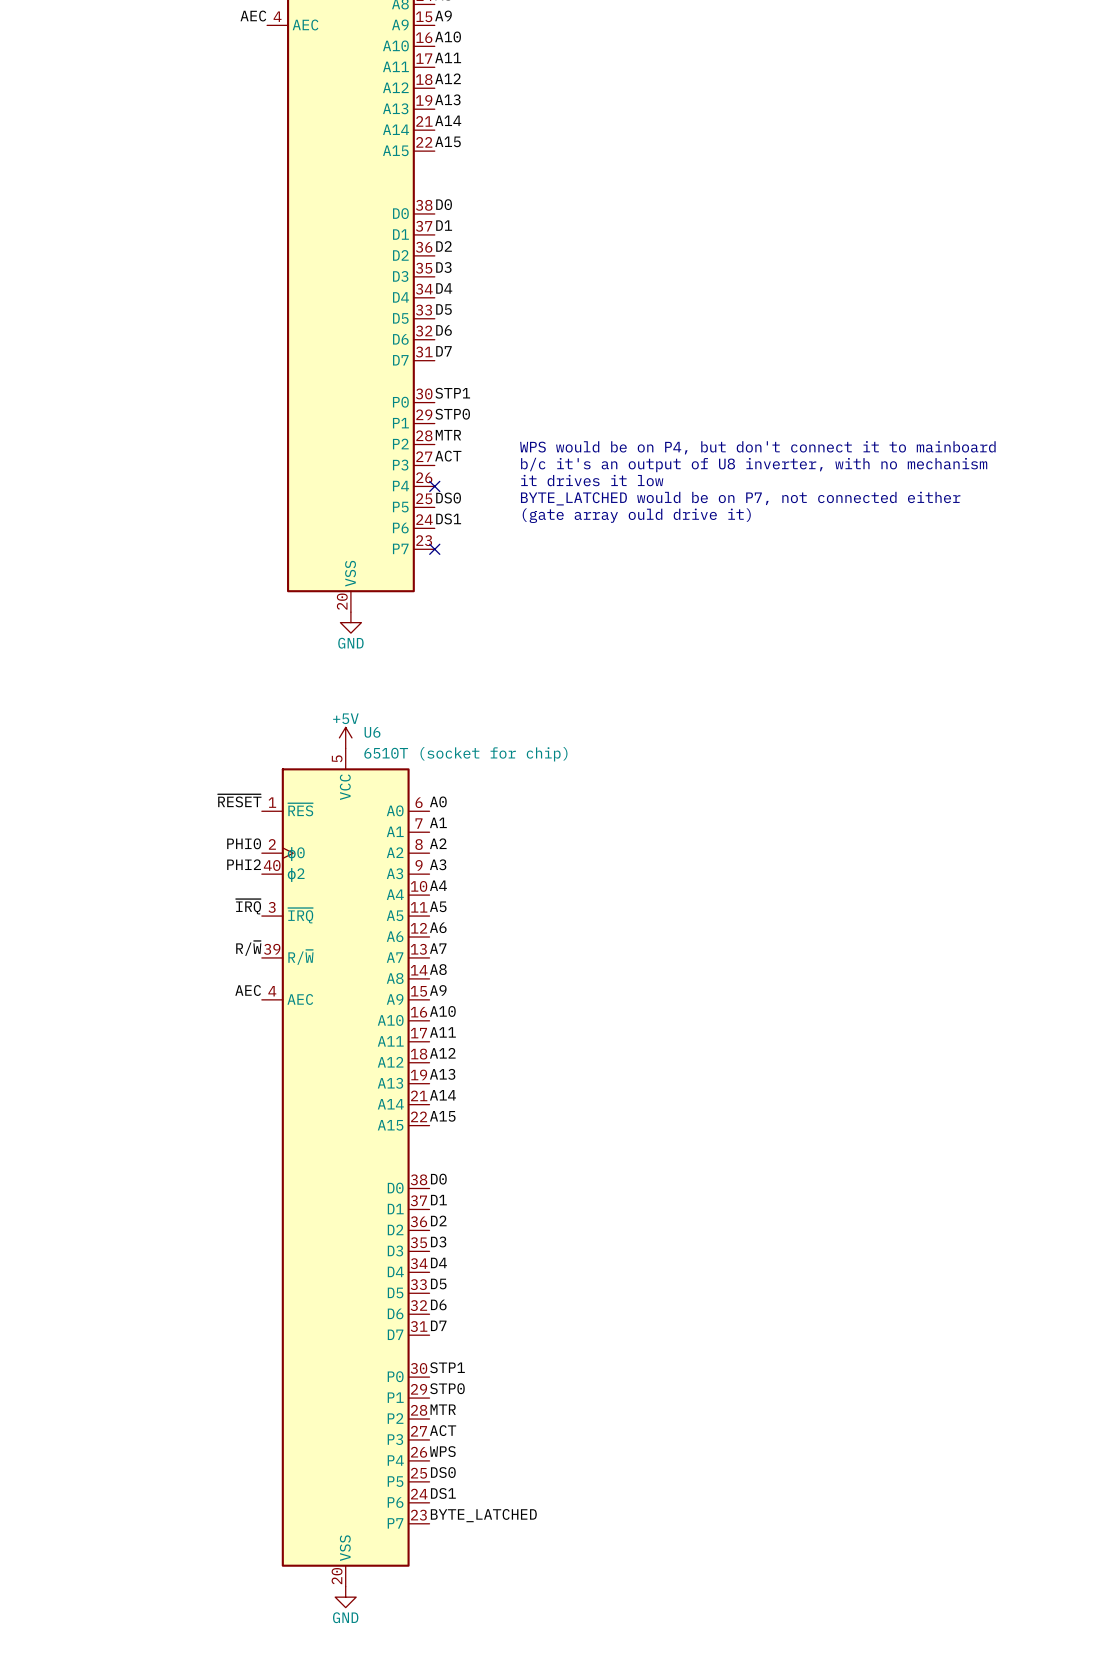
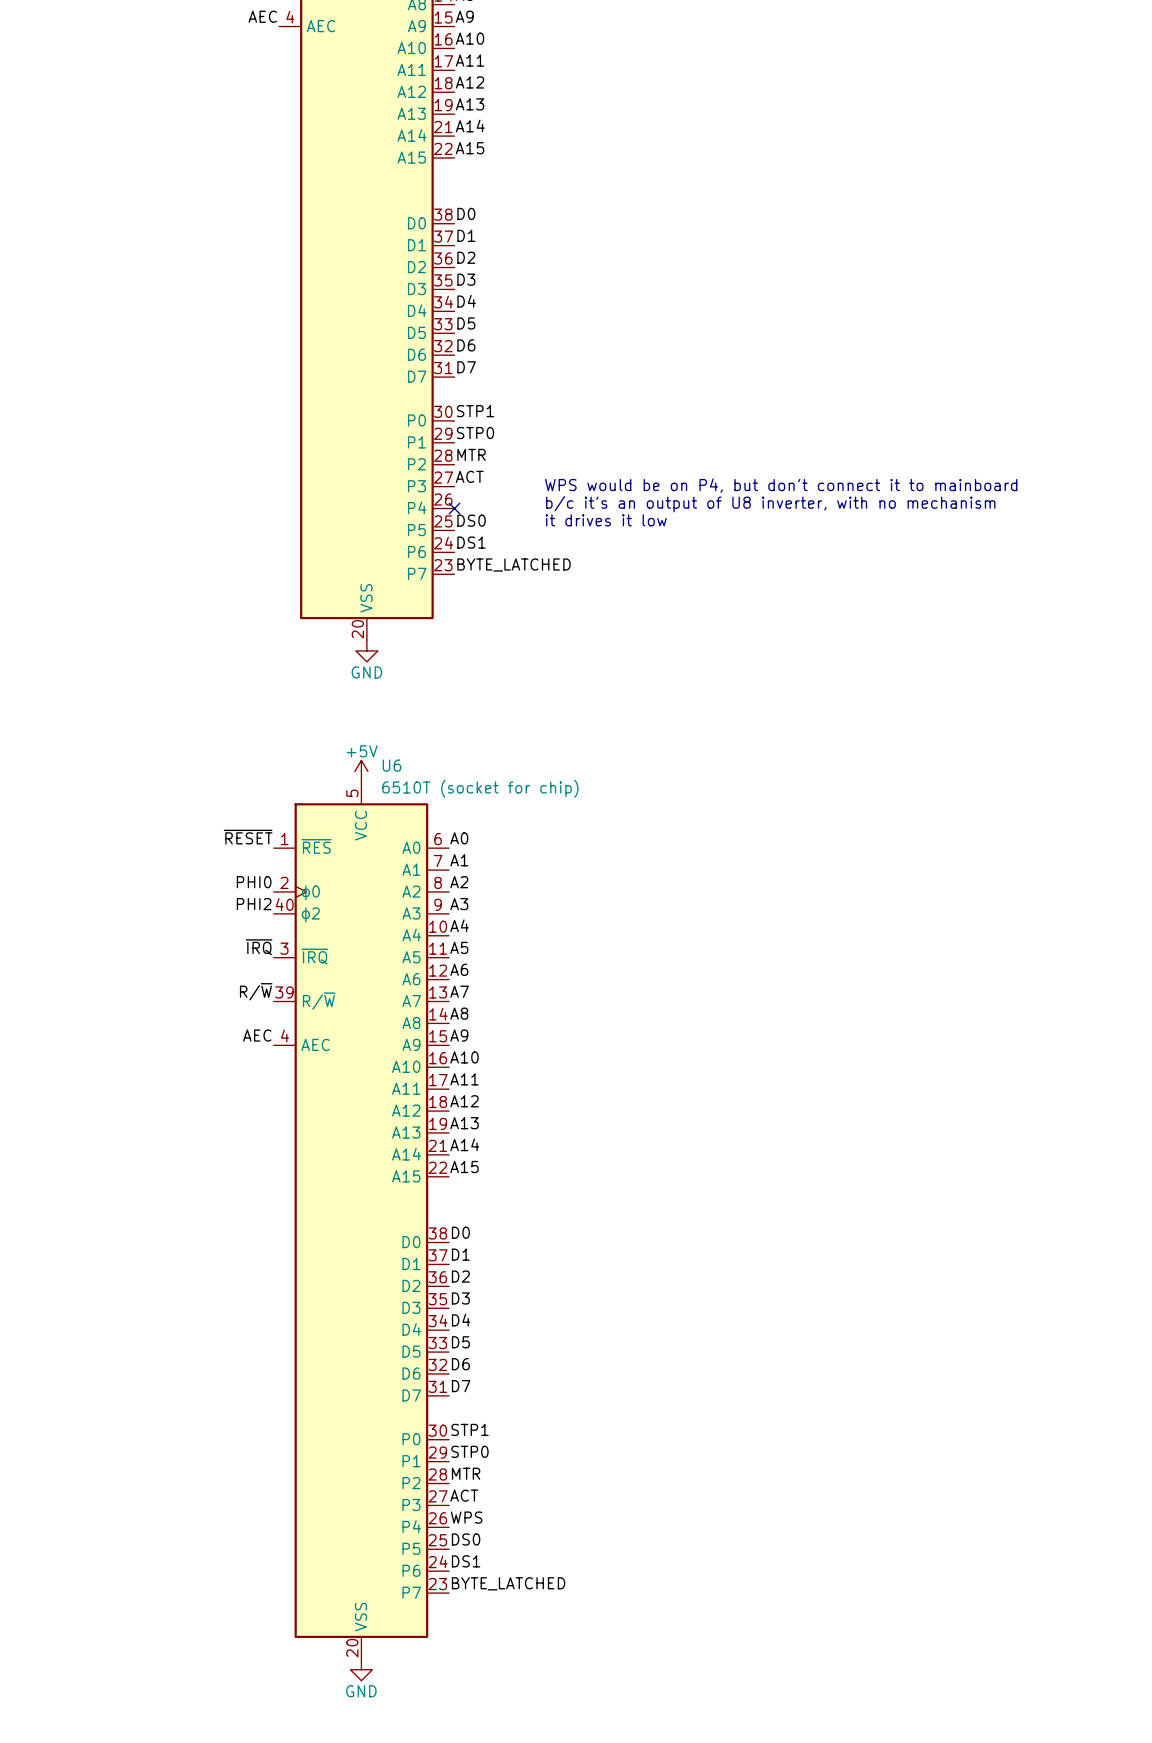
text: WPS would be on P4, but don't connect it to mainboard (757, 447) -> none
text: b/c it's an output of U8 inverter, with no mechanism (754, 464) -> WPS would be on P4, but don't connect it to mainboard (781, 485)
text: it drives it low (592, 480) -> b/c it's an output of U8 inverter, with no mechanism (770, 504)
text: BYTE_LATCHED would be on P7, not connected either (740, 498) -> it drives it low (606, 520)
text: (gate array ould drive it) (636, 515) -> none
label: none -> BYTE_LATCHED (514, 565)
no-connect mark: (434, 549) -> none

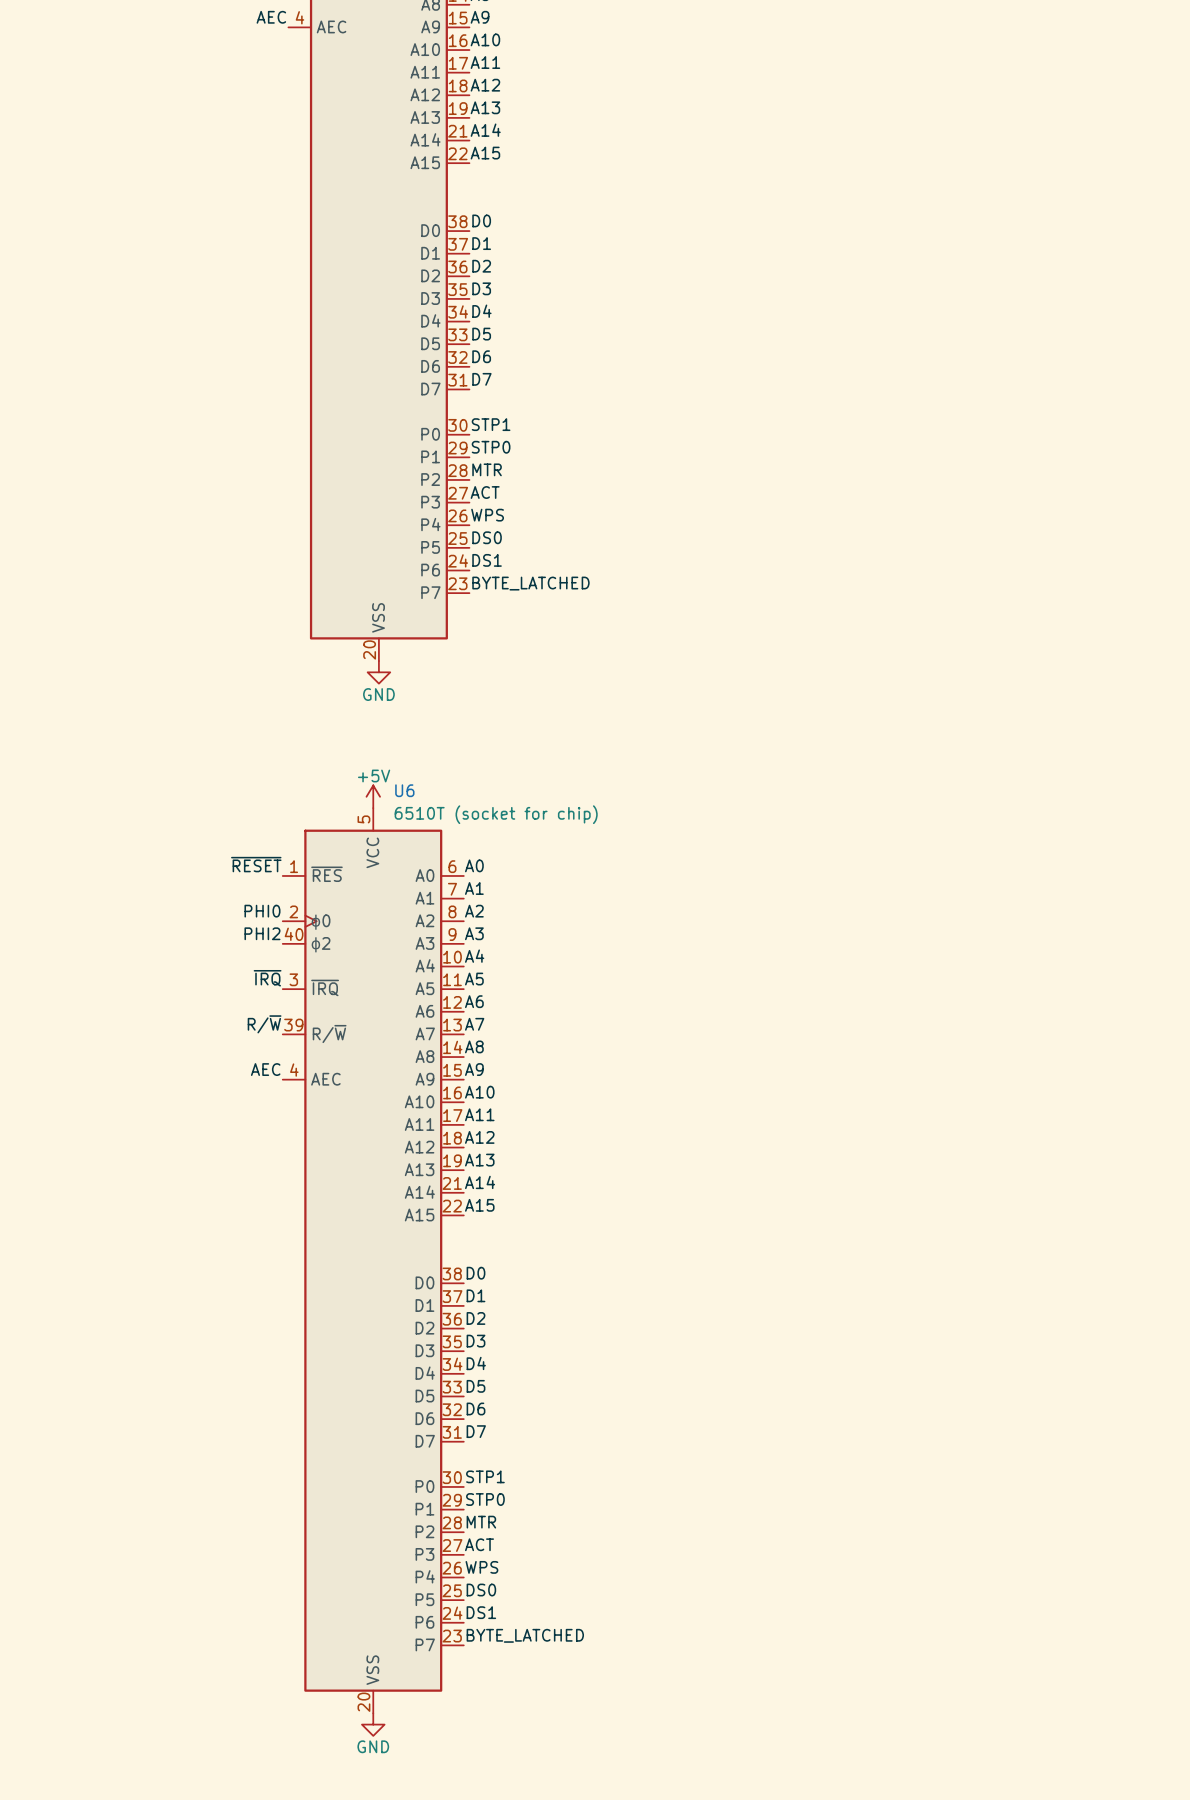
text: WPS would be on P4, but don't connect it to mainboard (781, 485) -> none
label: none -> WPS (487, 515)
text: b/c it's an output of U8 inverter, with no mechanism (770, 504) -> none
no-connect mark: (454, 508) -> none
text: it drives it low (606, 520) -> none

